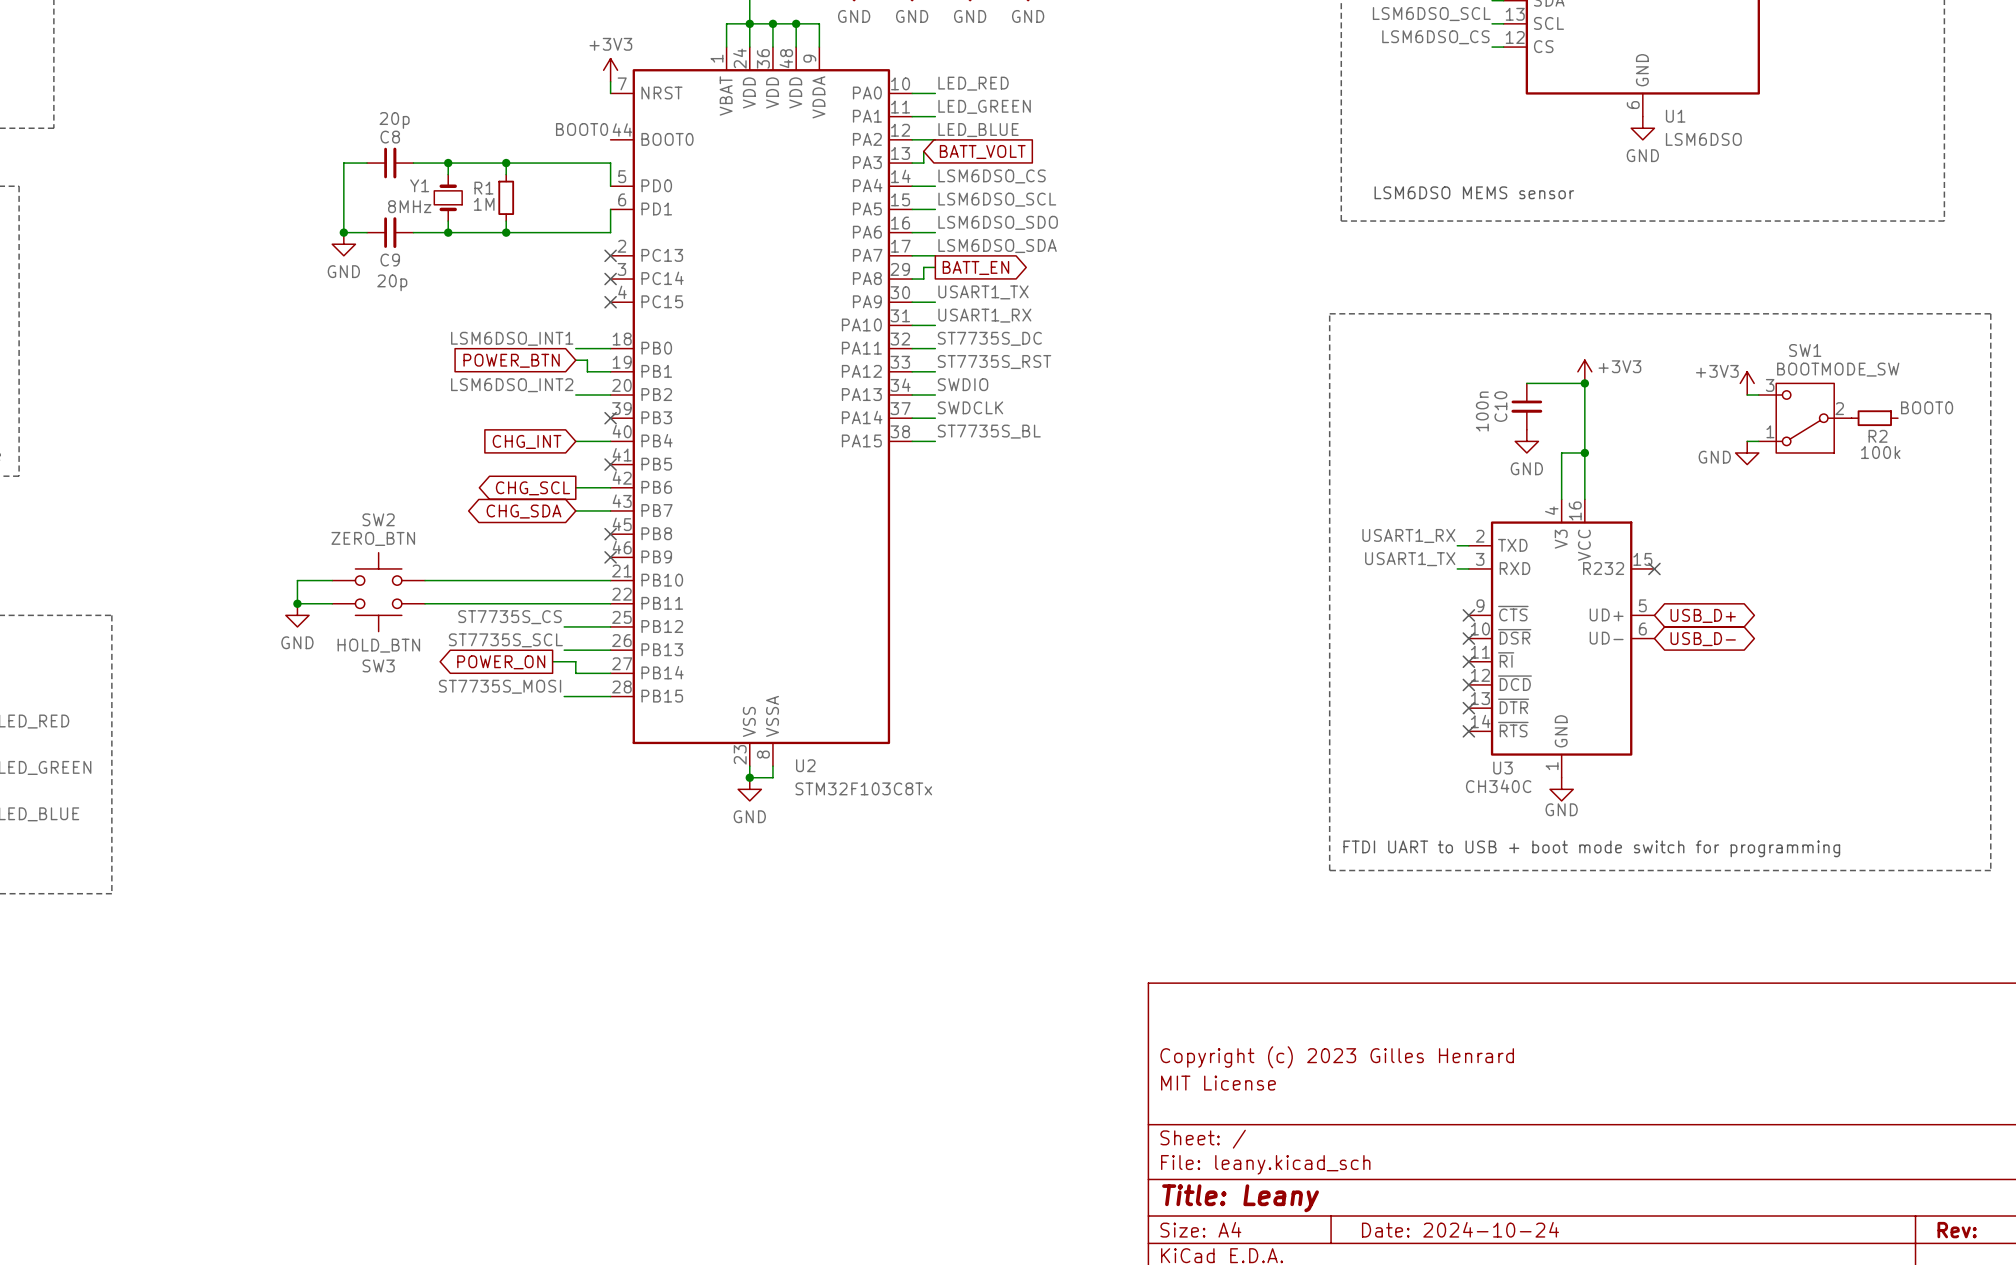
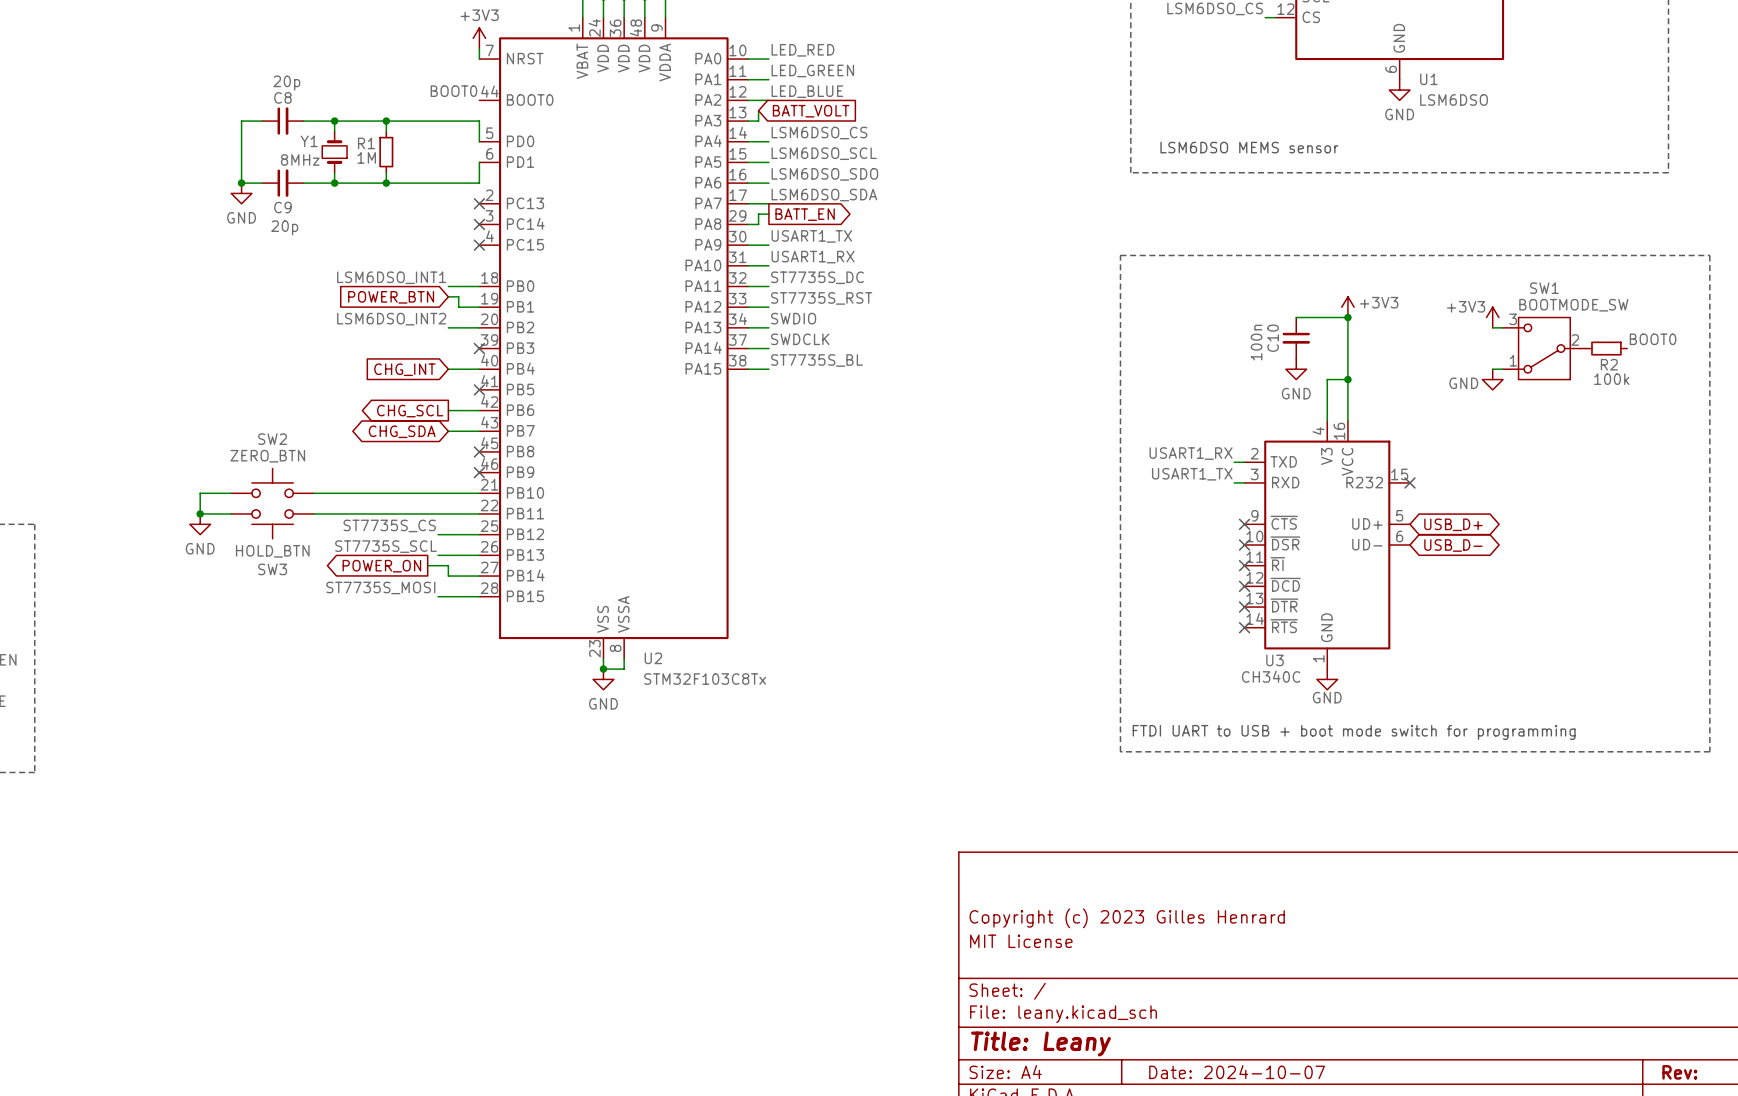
title block: Date: 2024-10-24 (1460, 1229) -> Date: 2024-10-07 (1237, 1072)

